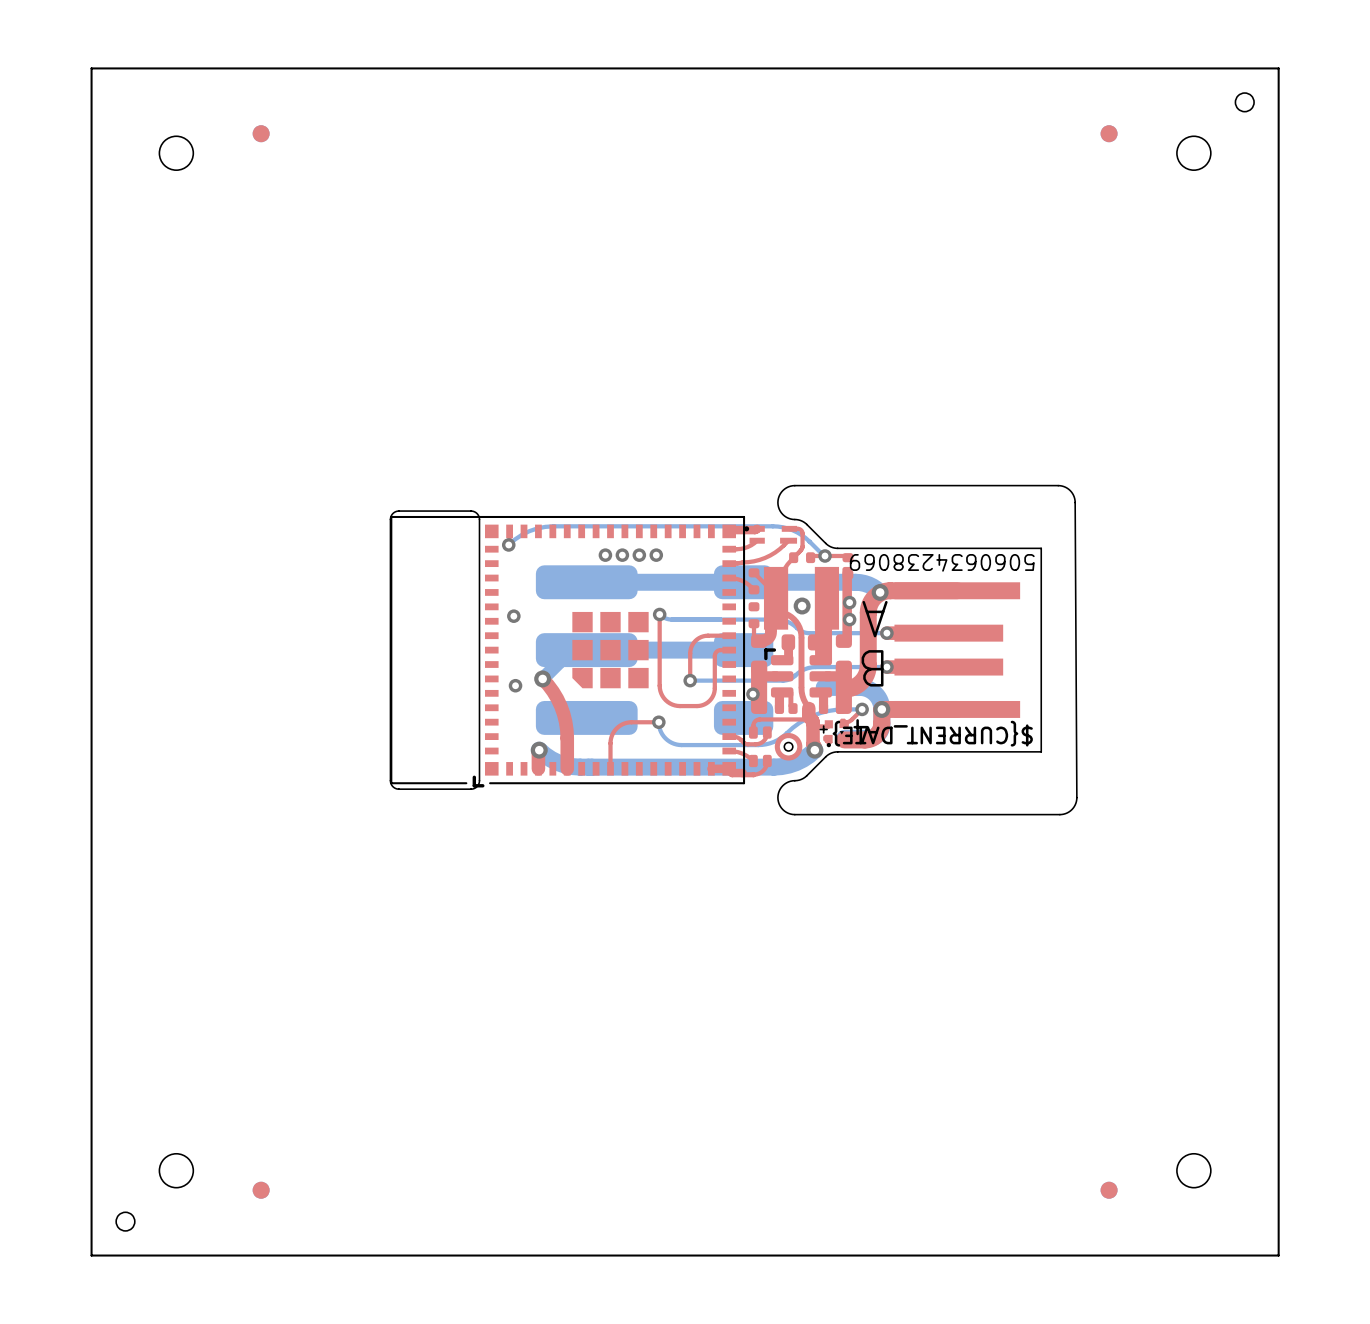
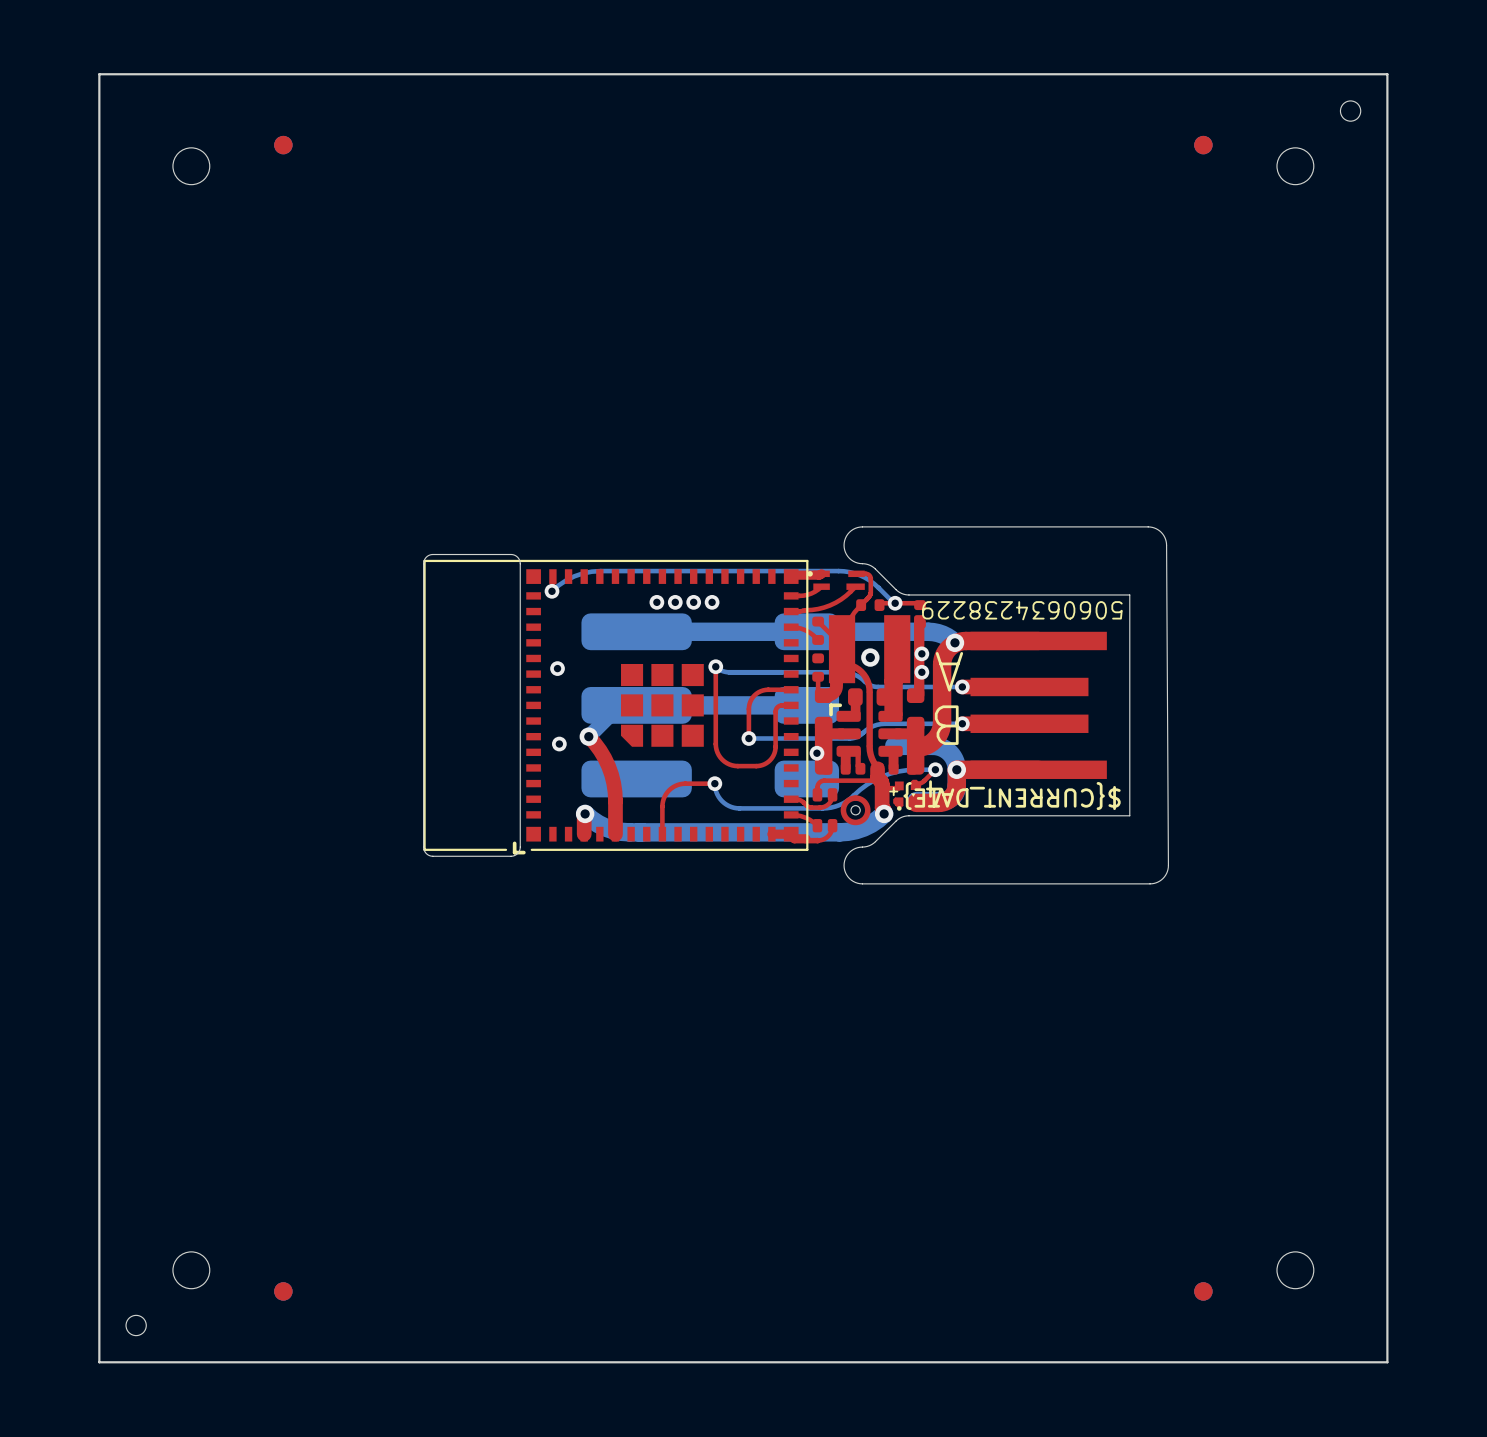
text: 5060634238069 (942, 562) -> 5060634238229 (1022, 610)

